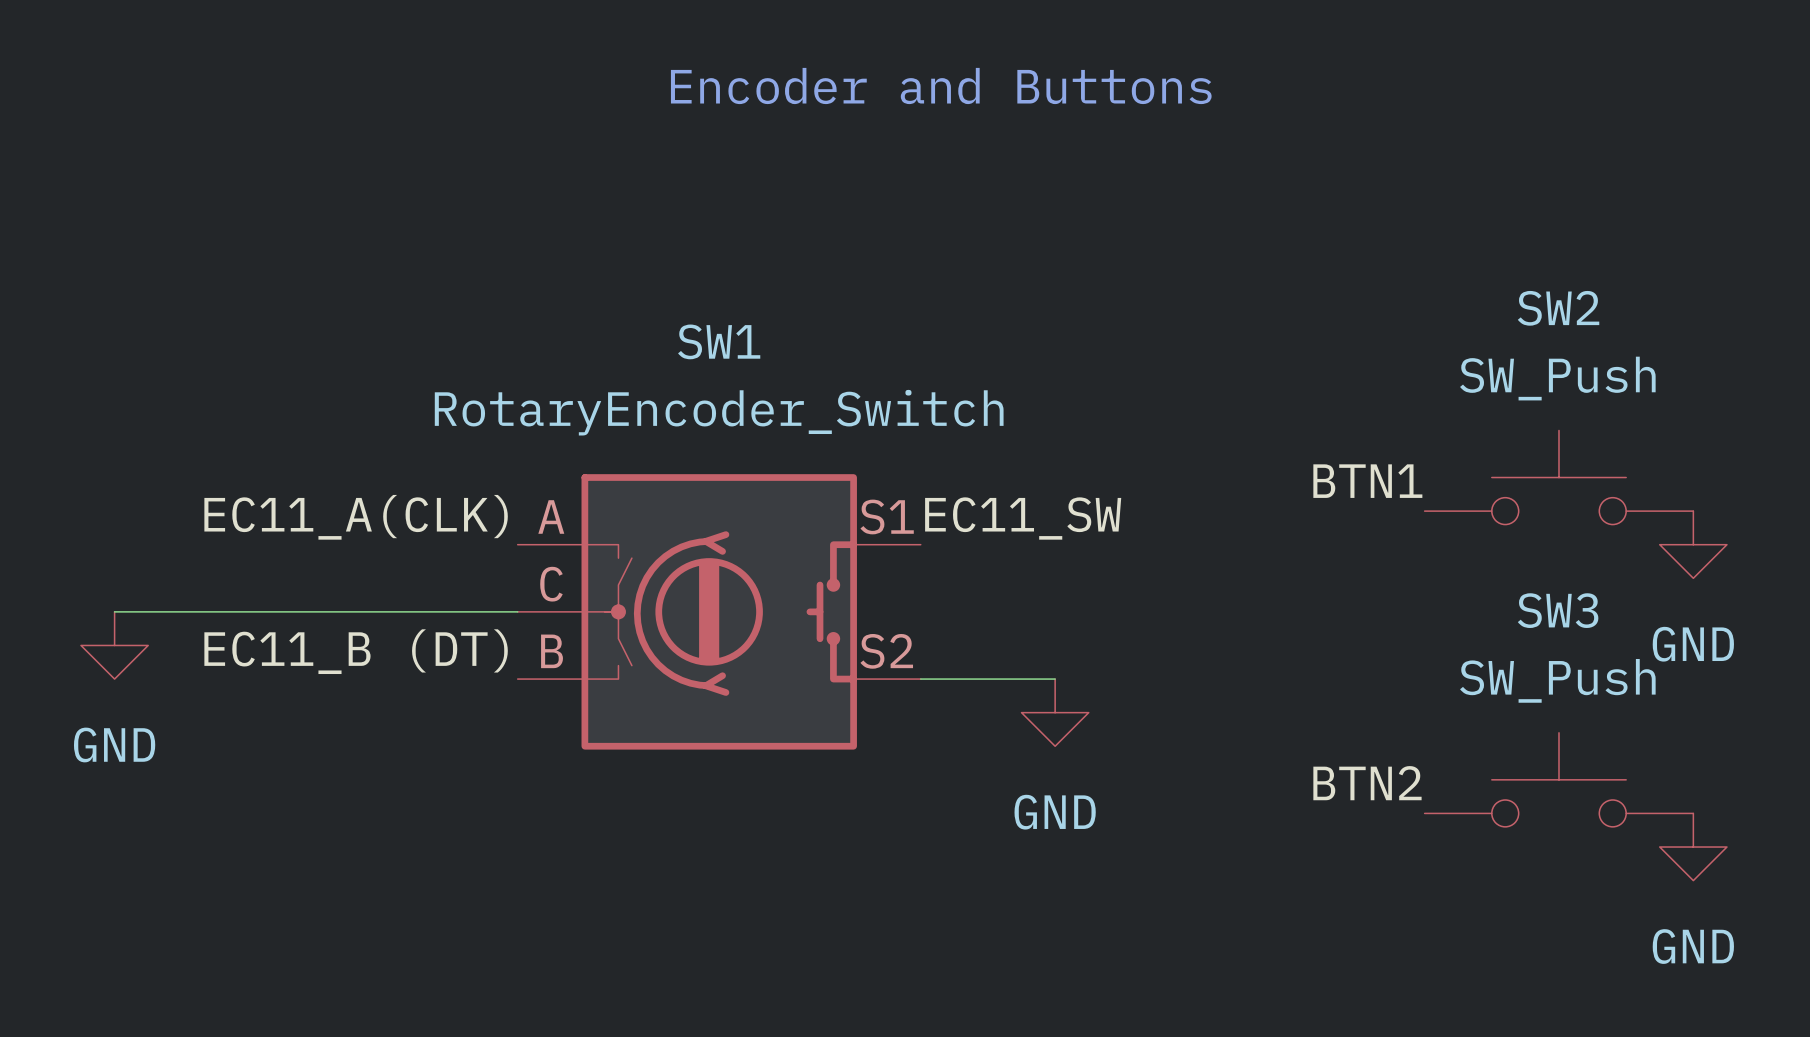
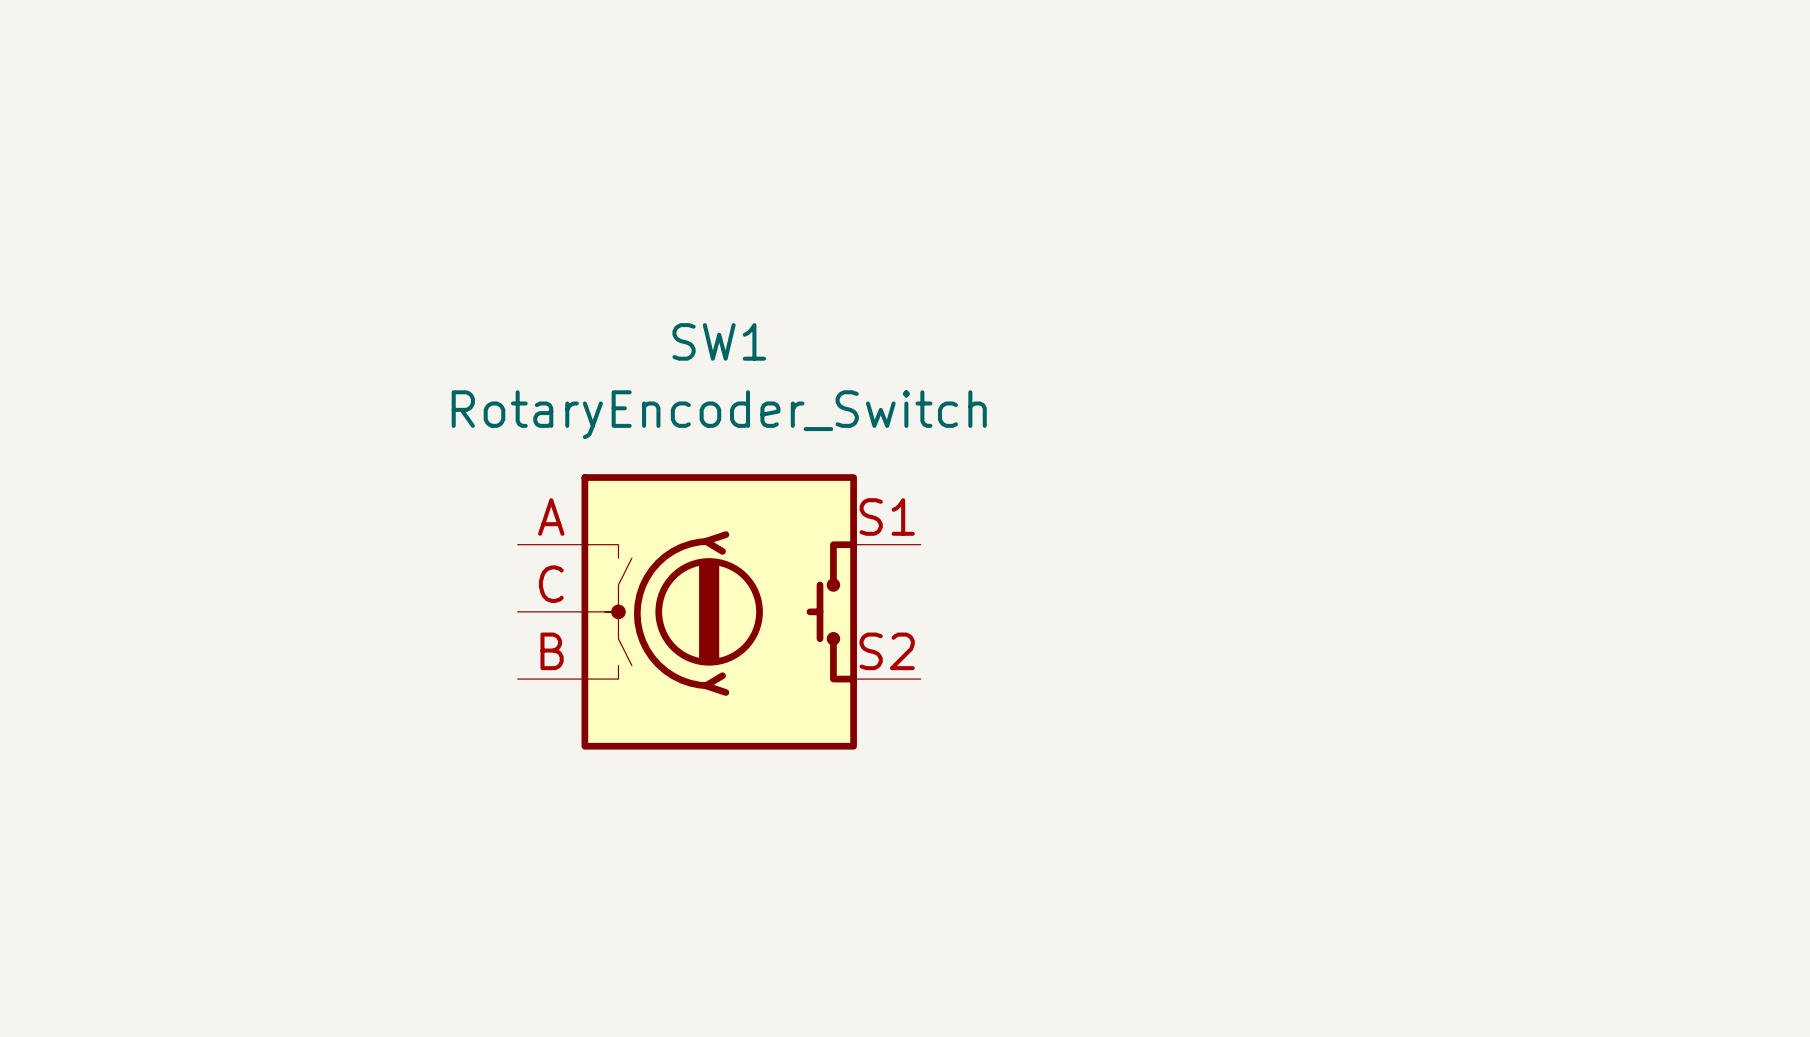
text: Encoder and Buttons (941, 85) -> none
SW2: SW_Push (1558, 477) -> none
label: BTN1 (1367, 481) -> none
label: EC11_A(CLK) (356, 517) -> none
label: EC11_SW (1023, 518) -> none
power symbol: GND (1693, 544) -> none
wire: (114, 611) (517, 611) -> none
power symbol: GND (114, 645) -> none
label: EC11_B (DT) (356, 651) -> none
wire: (920, 679) (1055, 679) -> none
power symbol: GND (1055, 712) -> none
SW3: SW_Push (1558, 779) -> none
label: BTN2 (1367, 783) -> none
power symbol: GND (1693, 847) -> none

